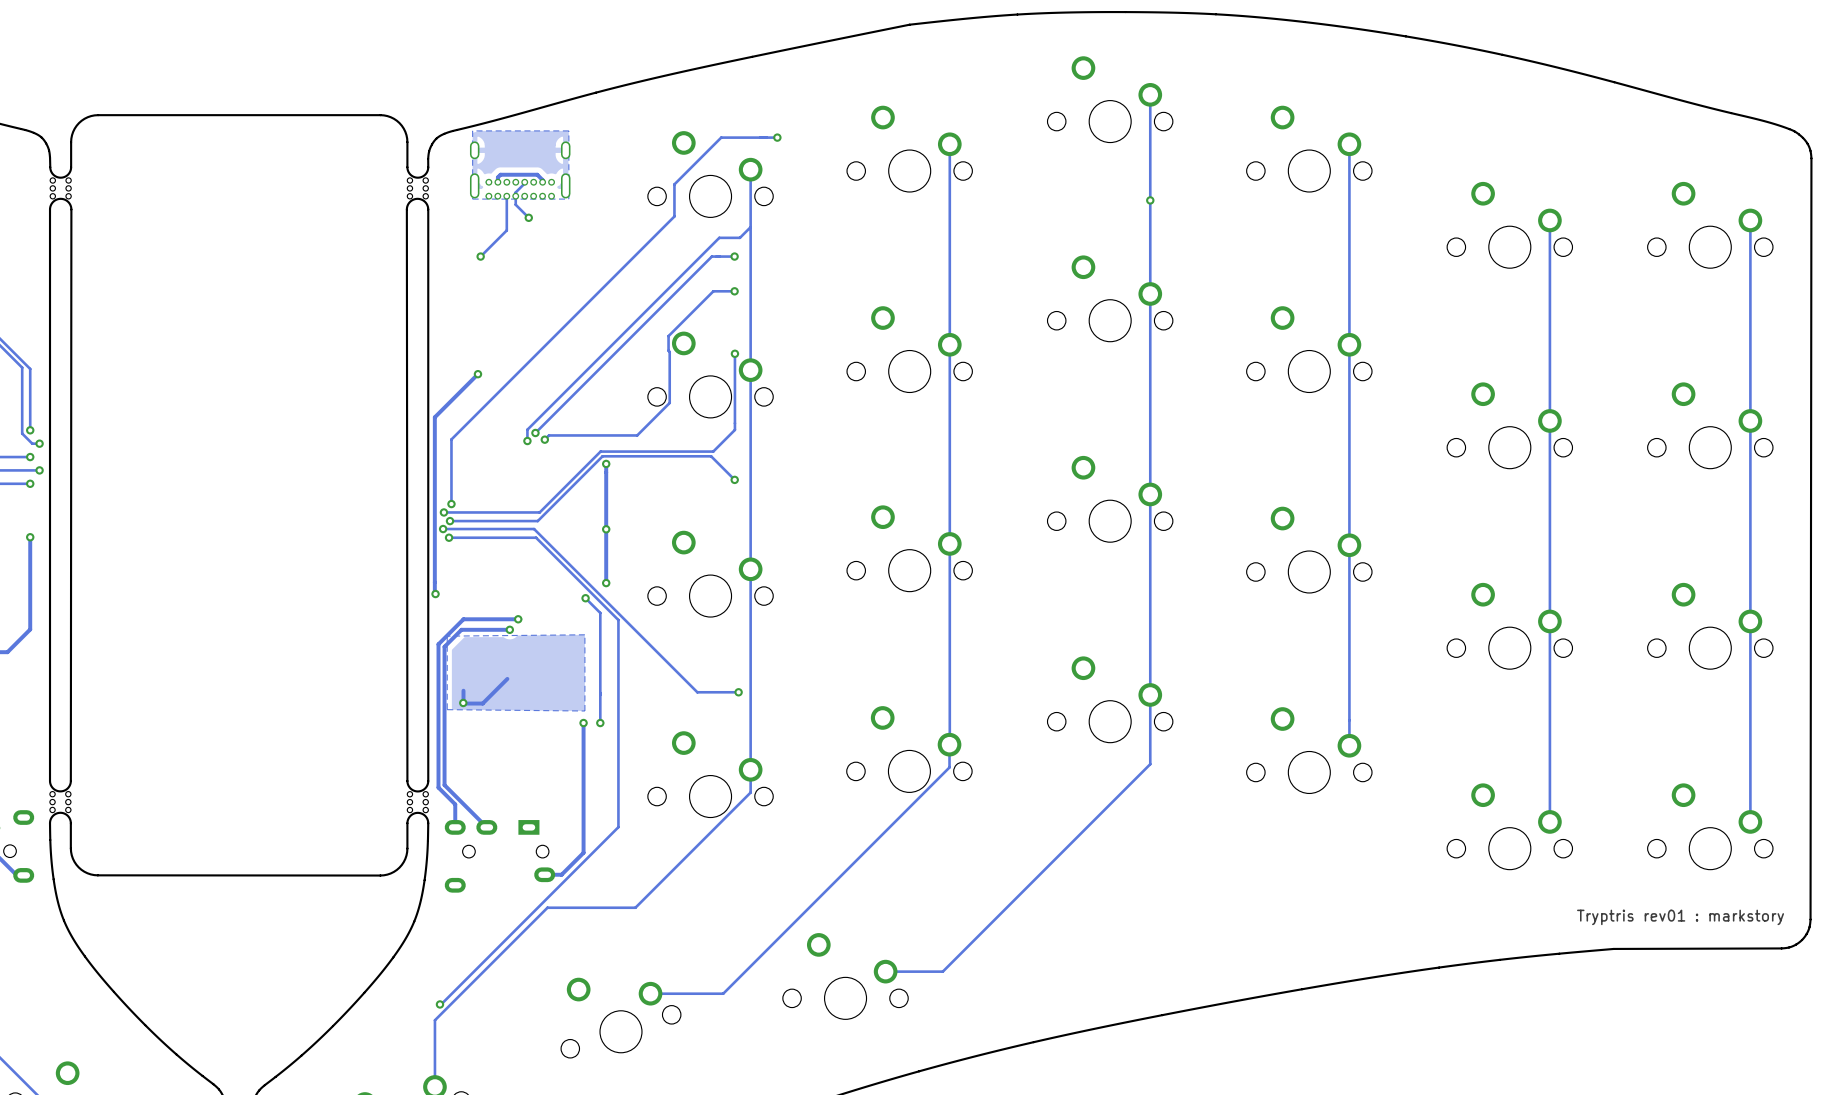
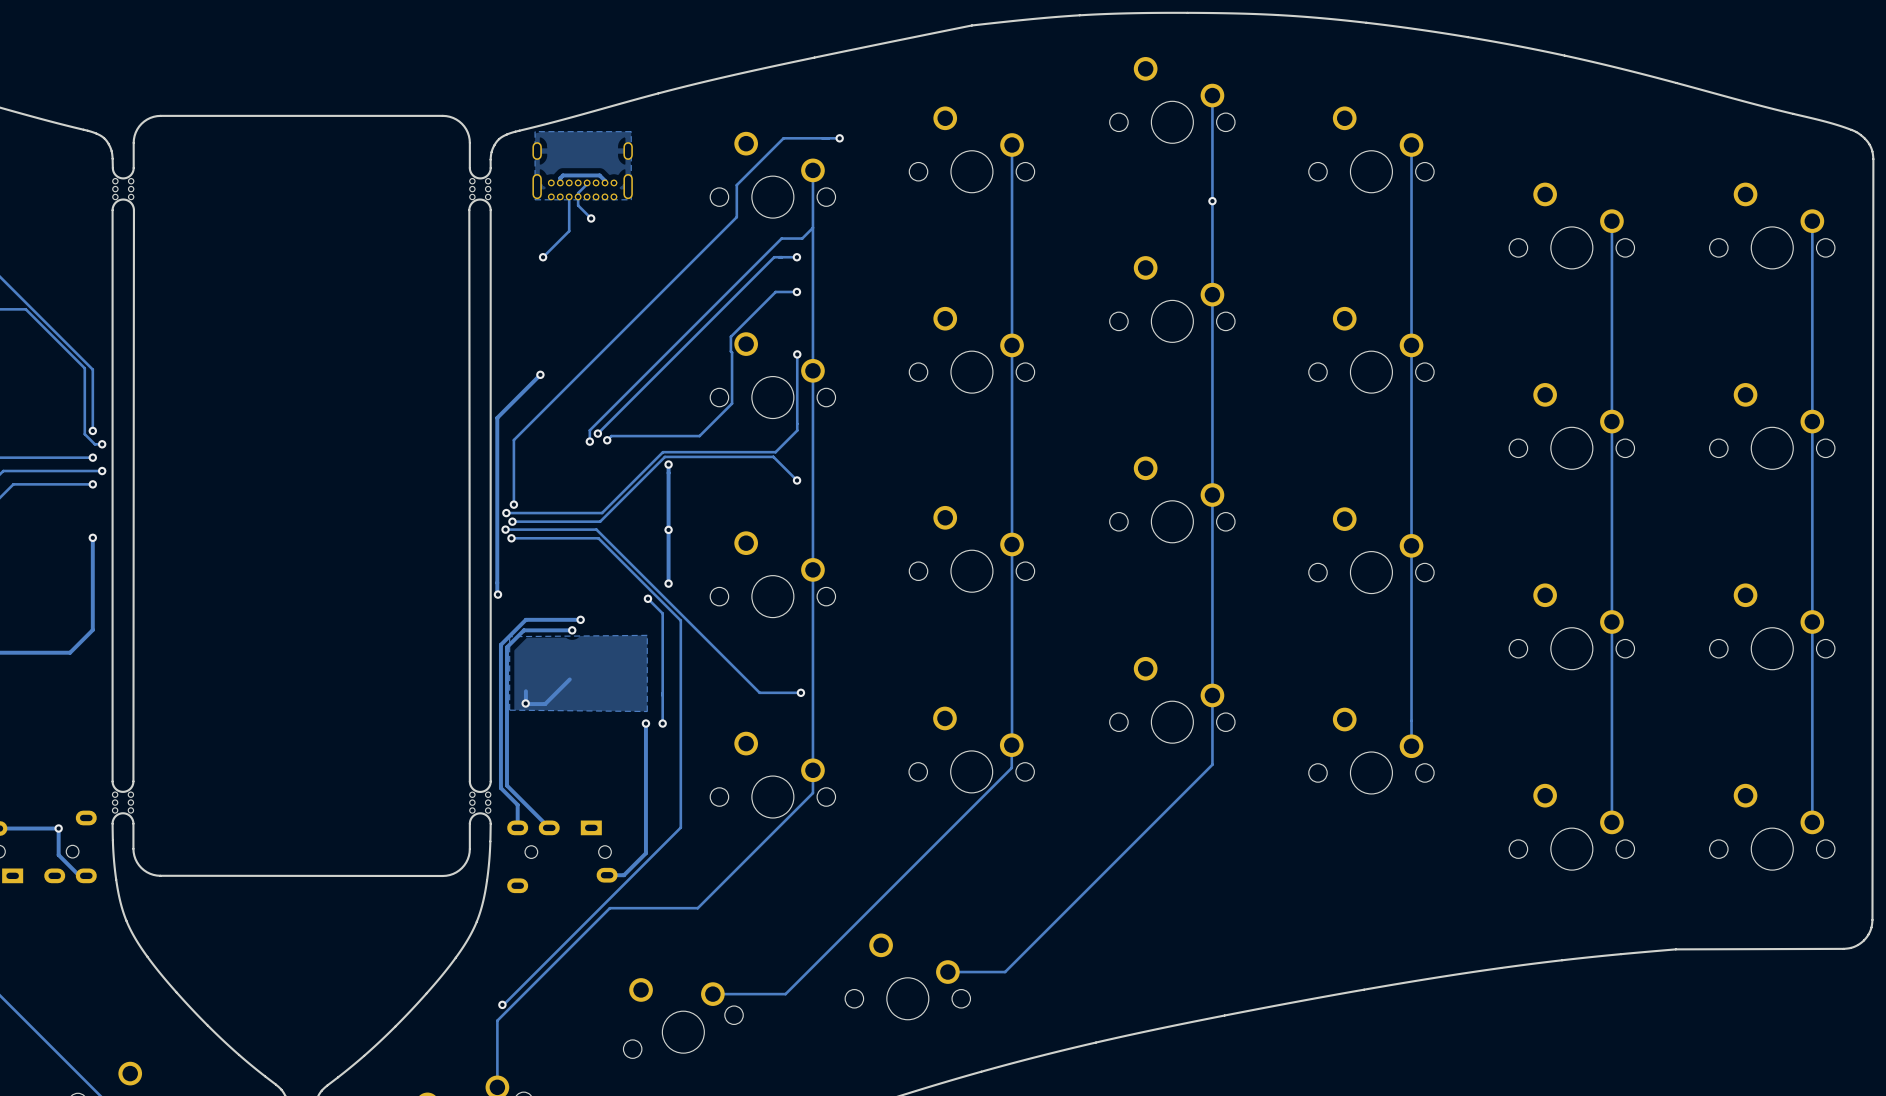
text: Tryptris rev01 : markstory (1680, 917) -> none

